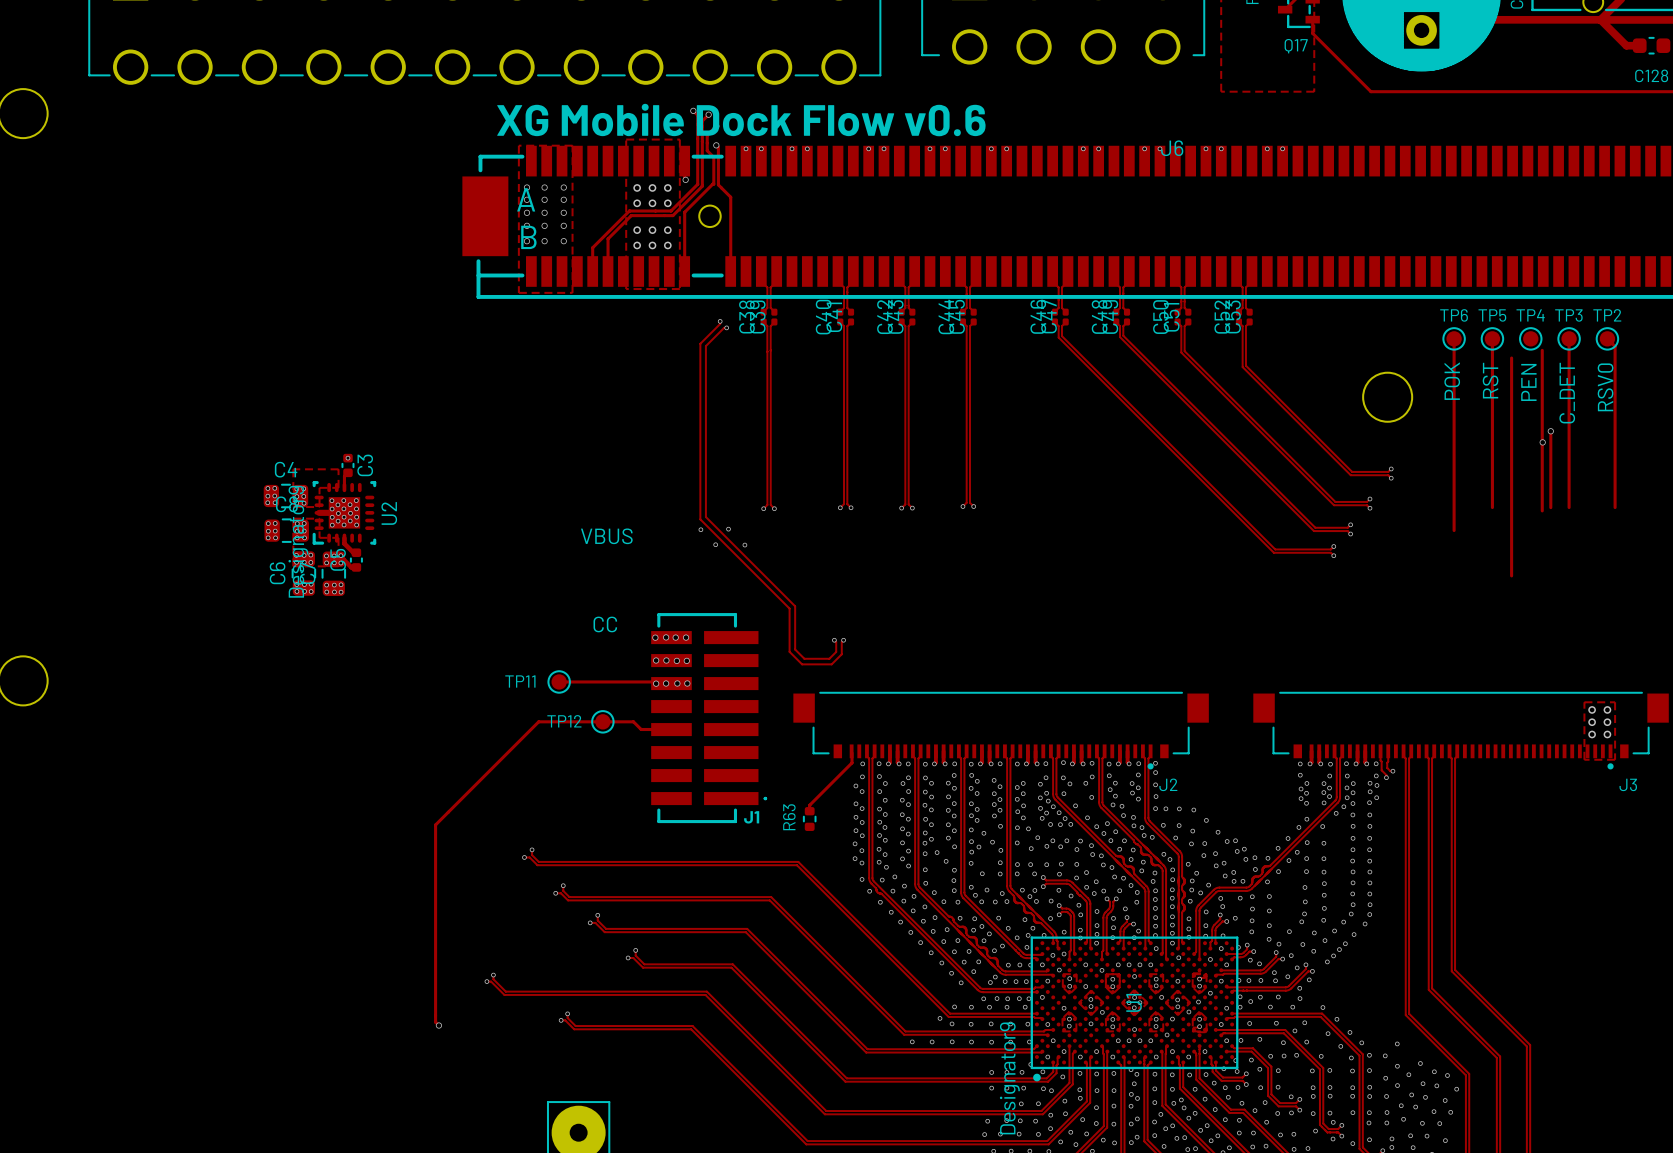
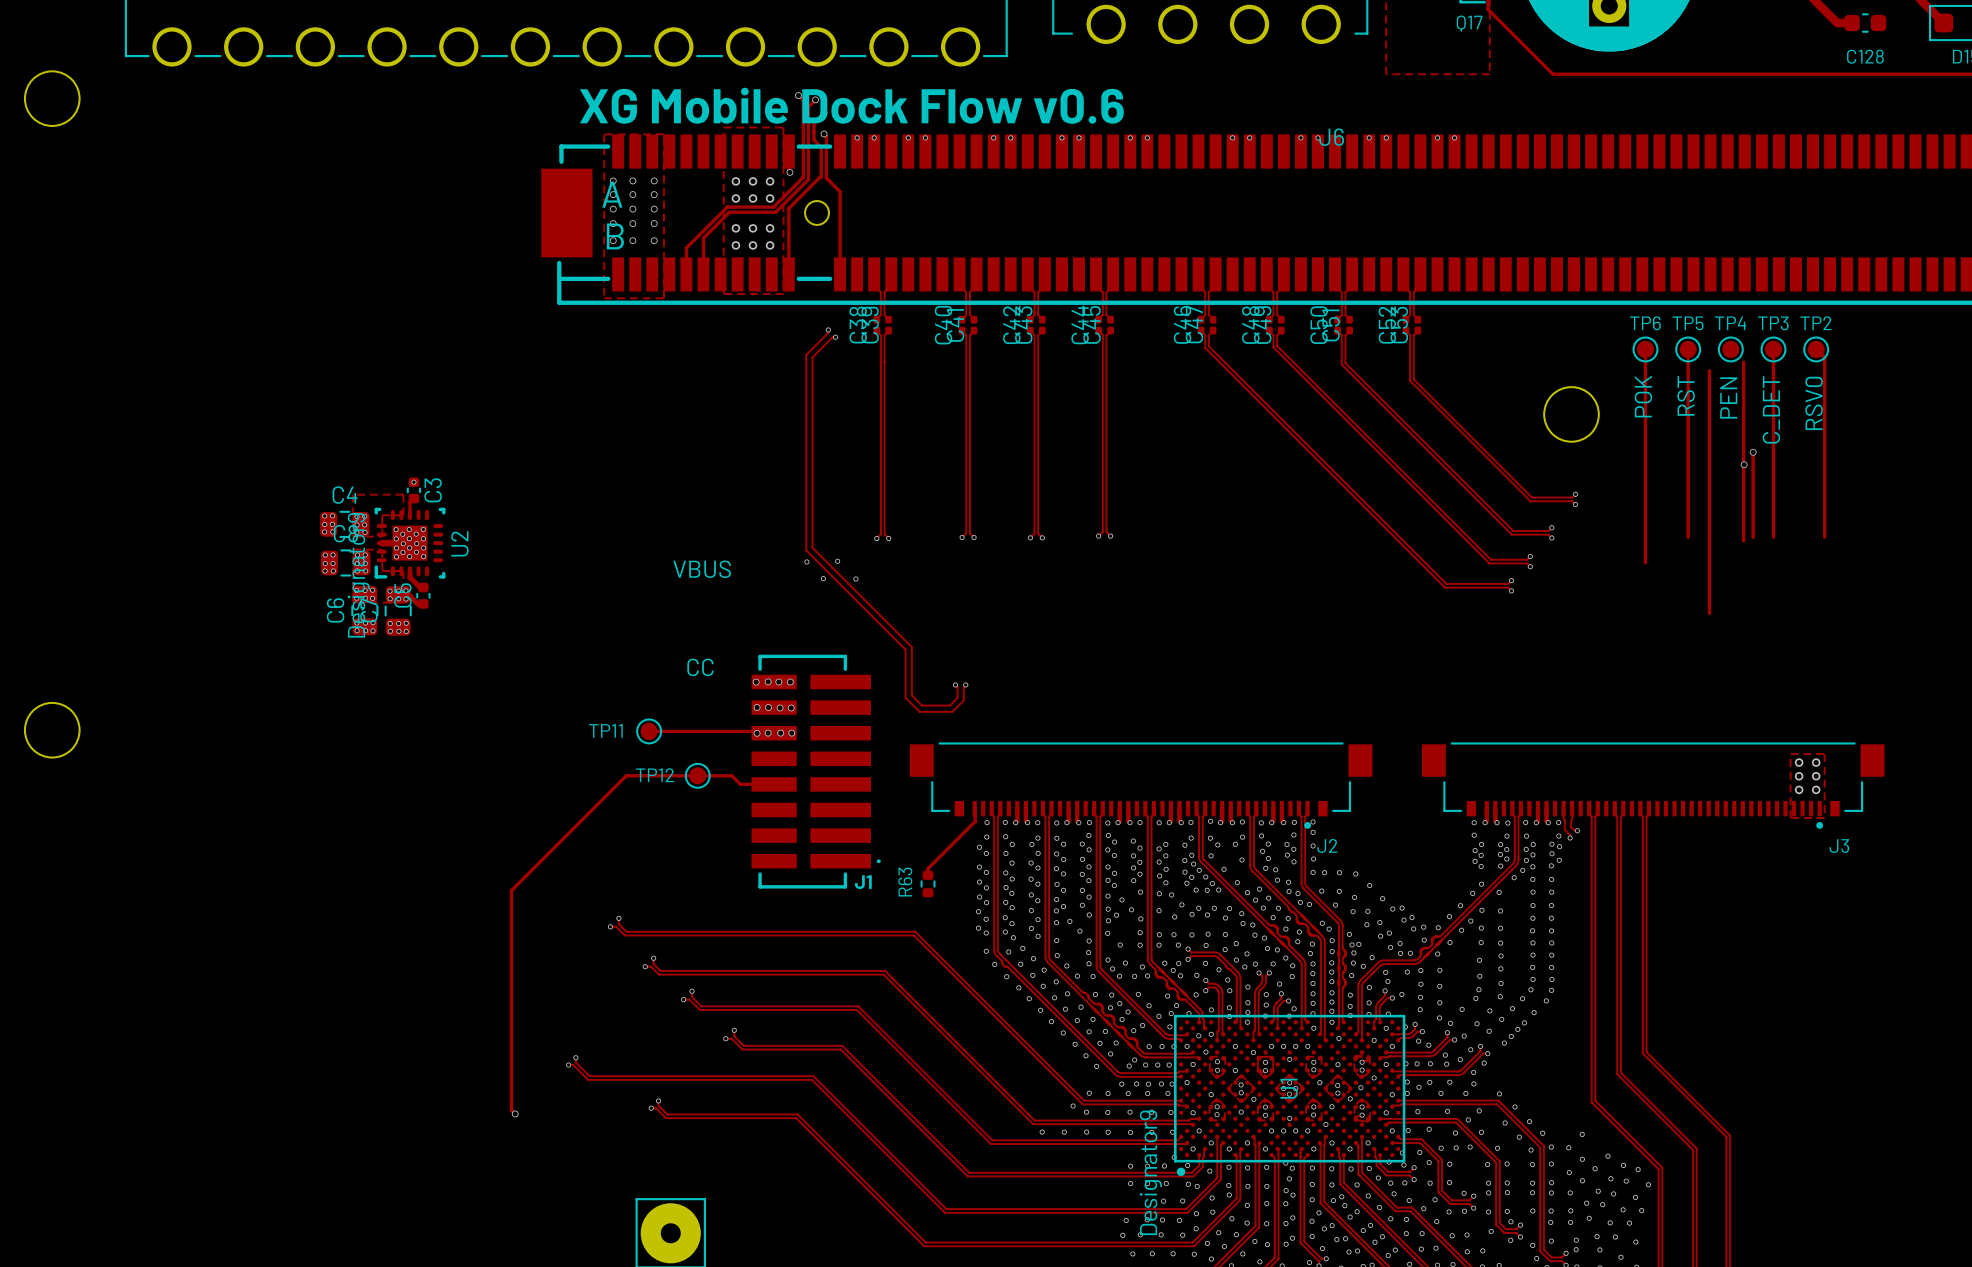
via: none -> (1352, 944)

